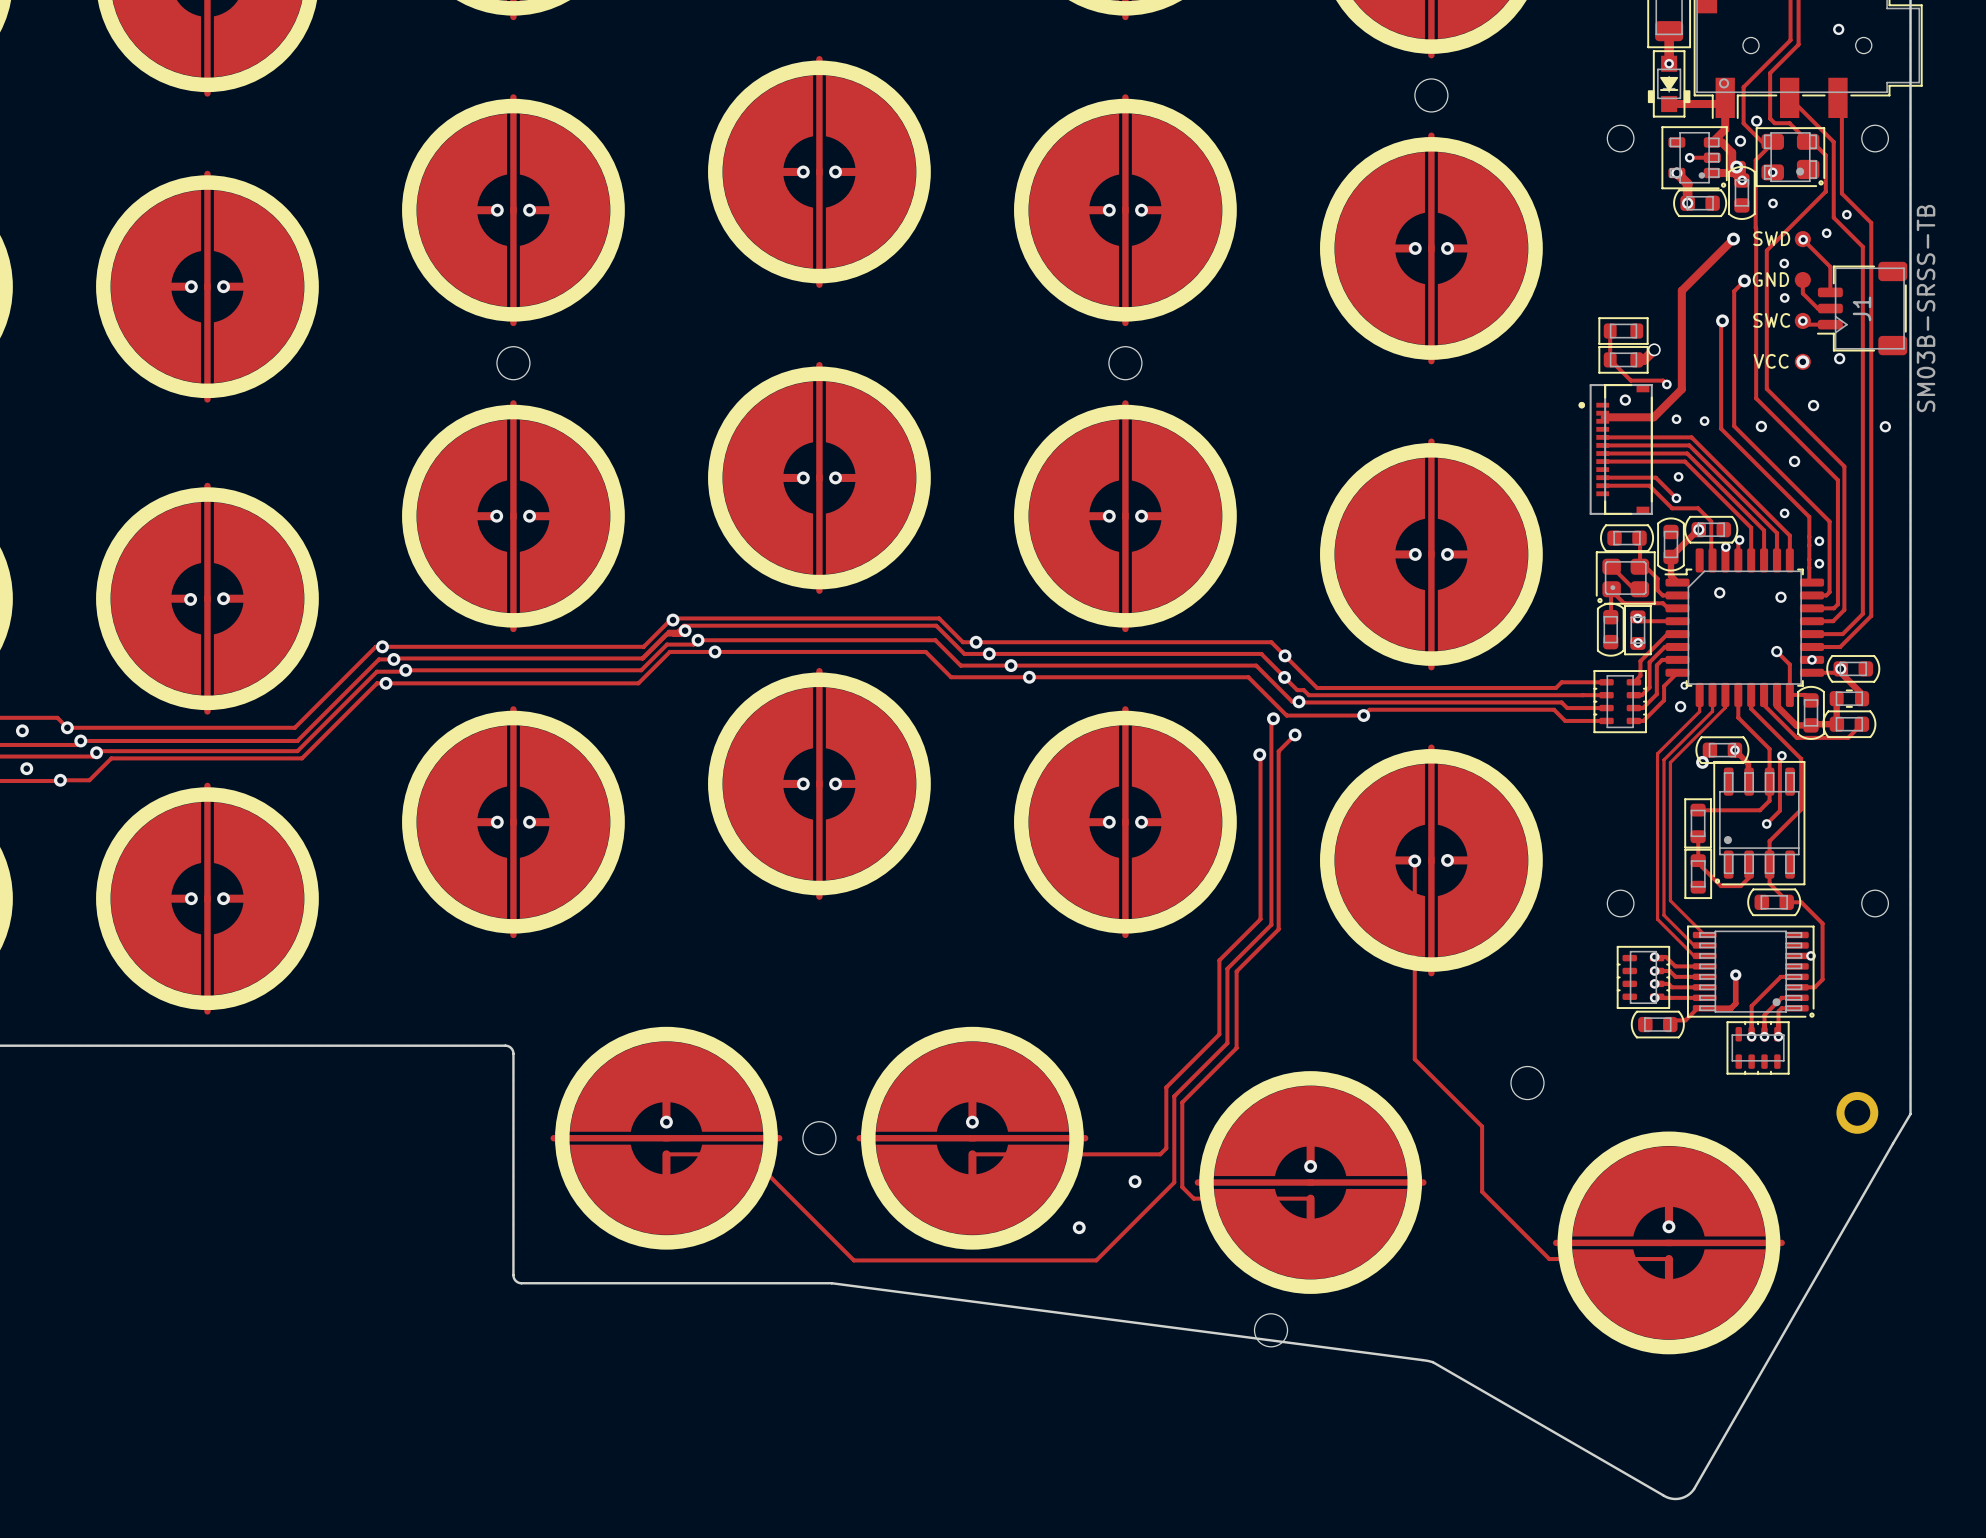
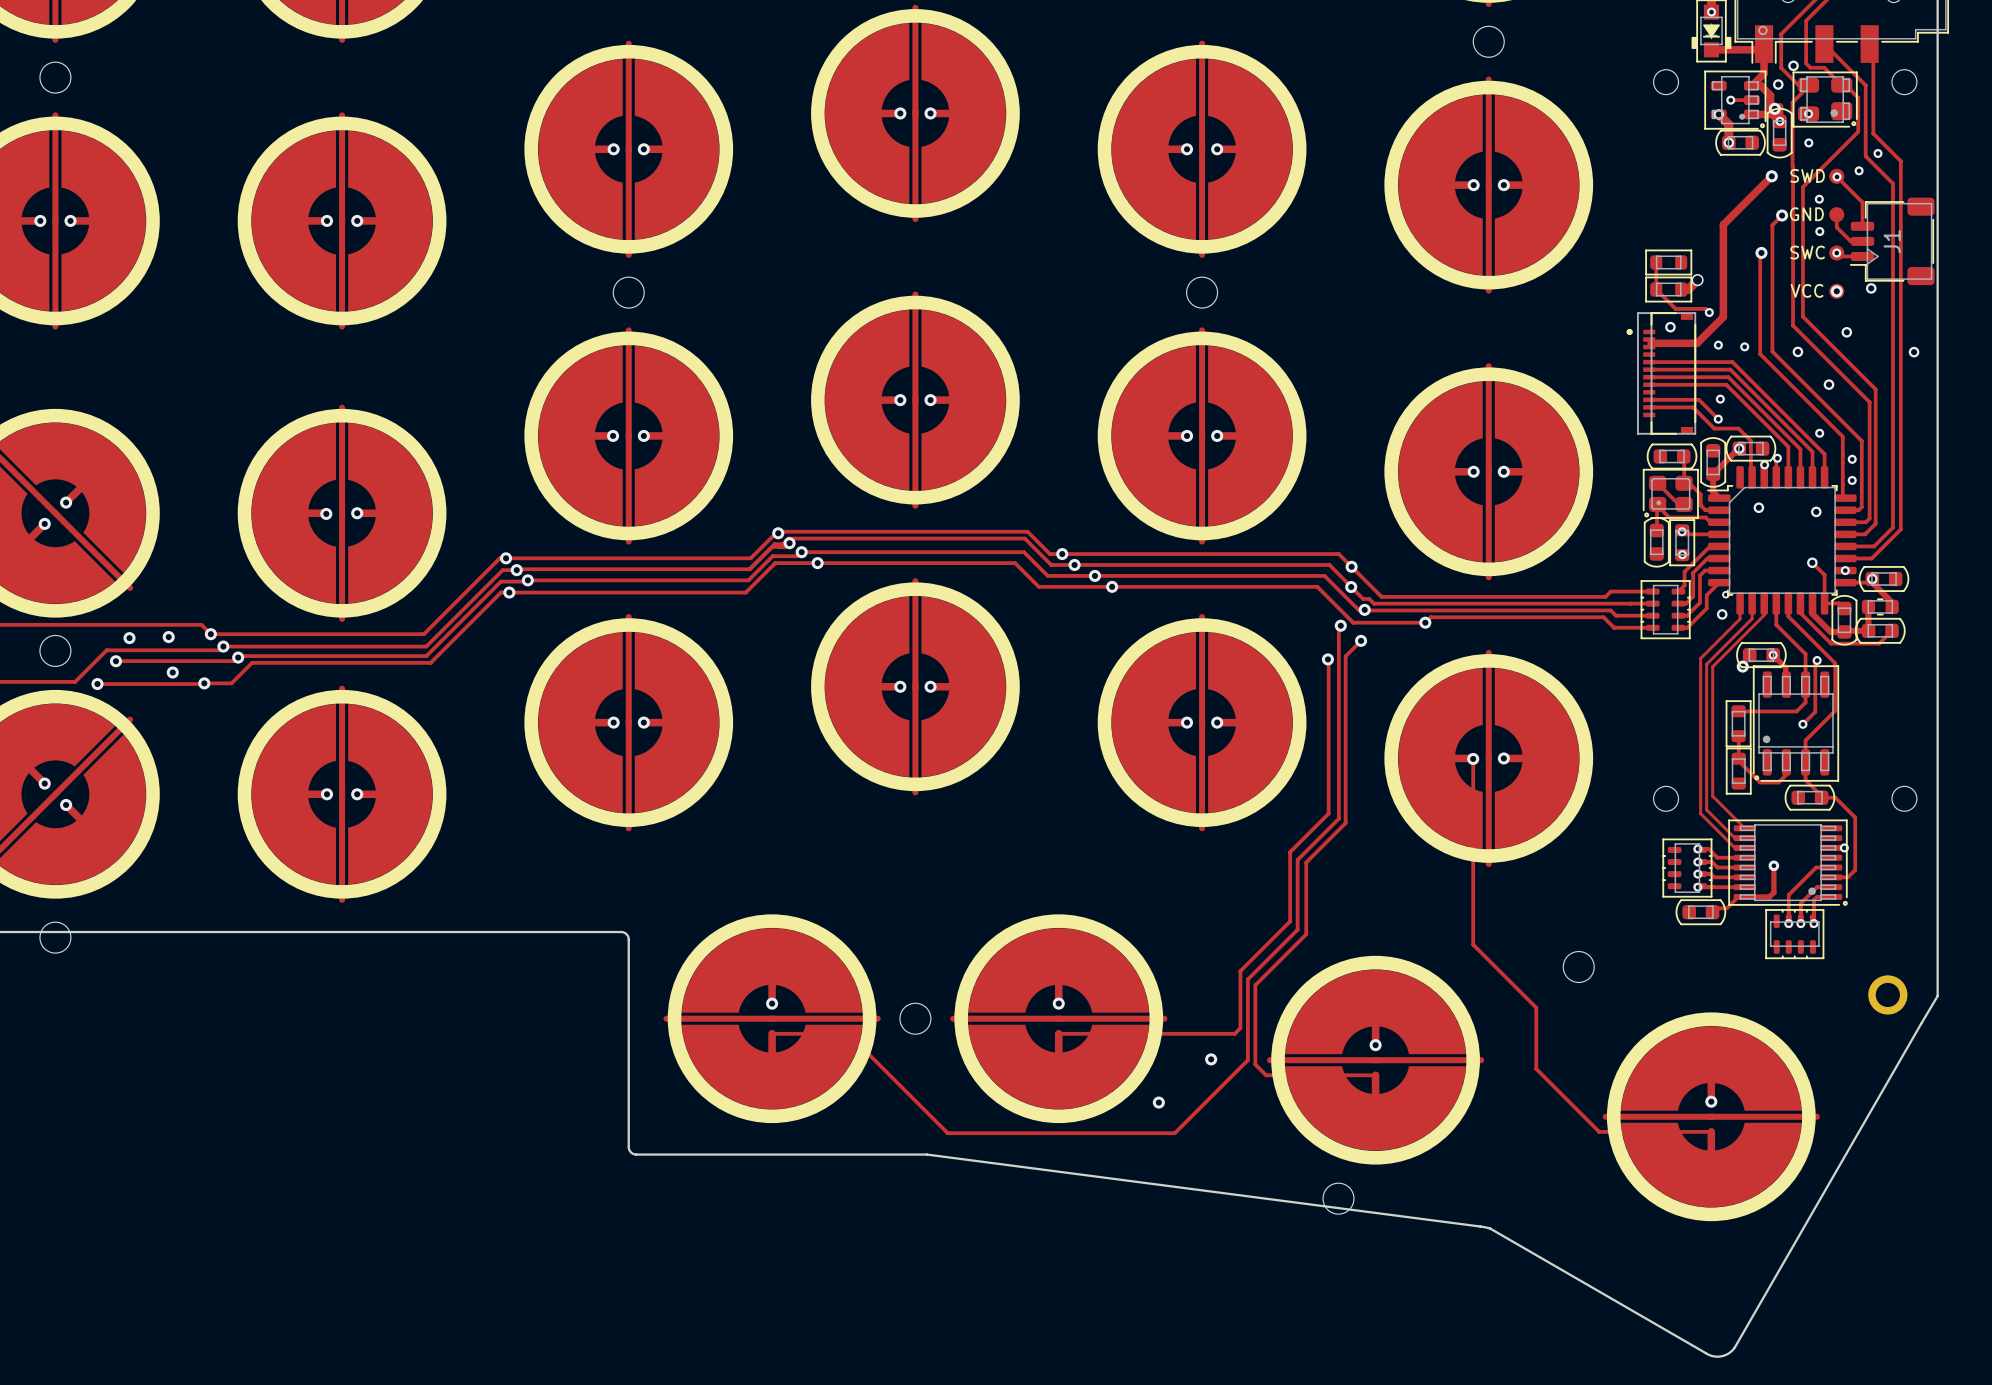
J1 value: SM03B-SRSS-TB (1926, 308) -> none

